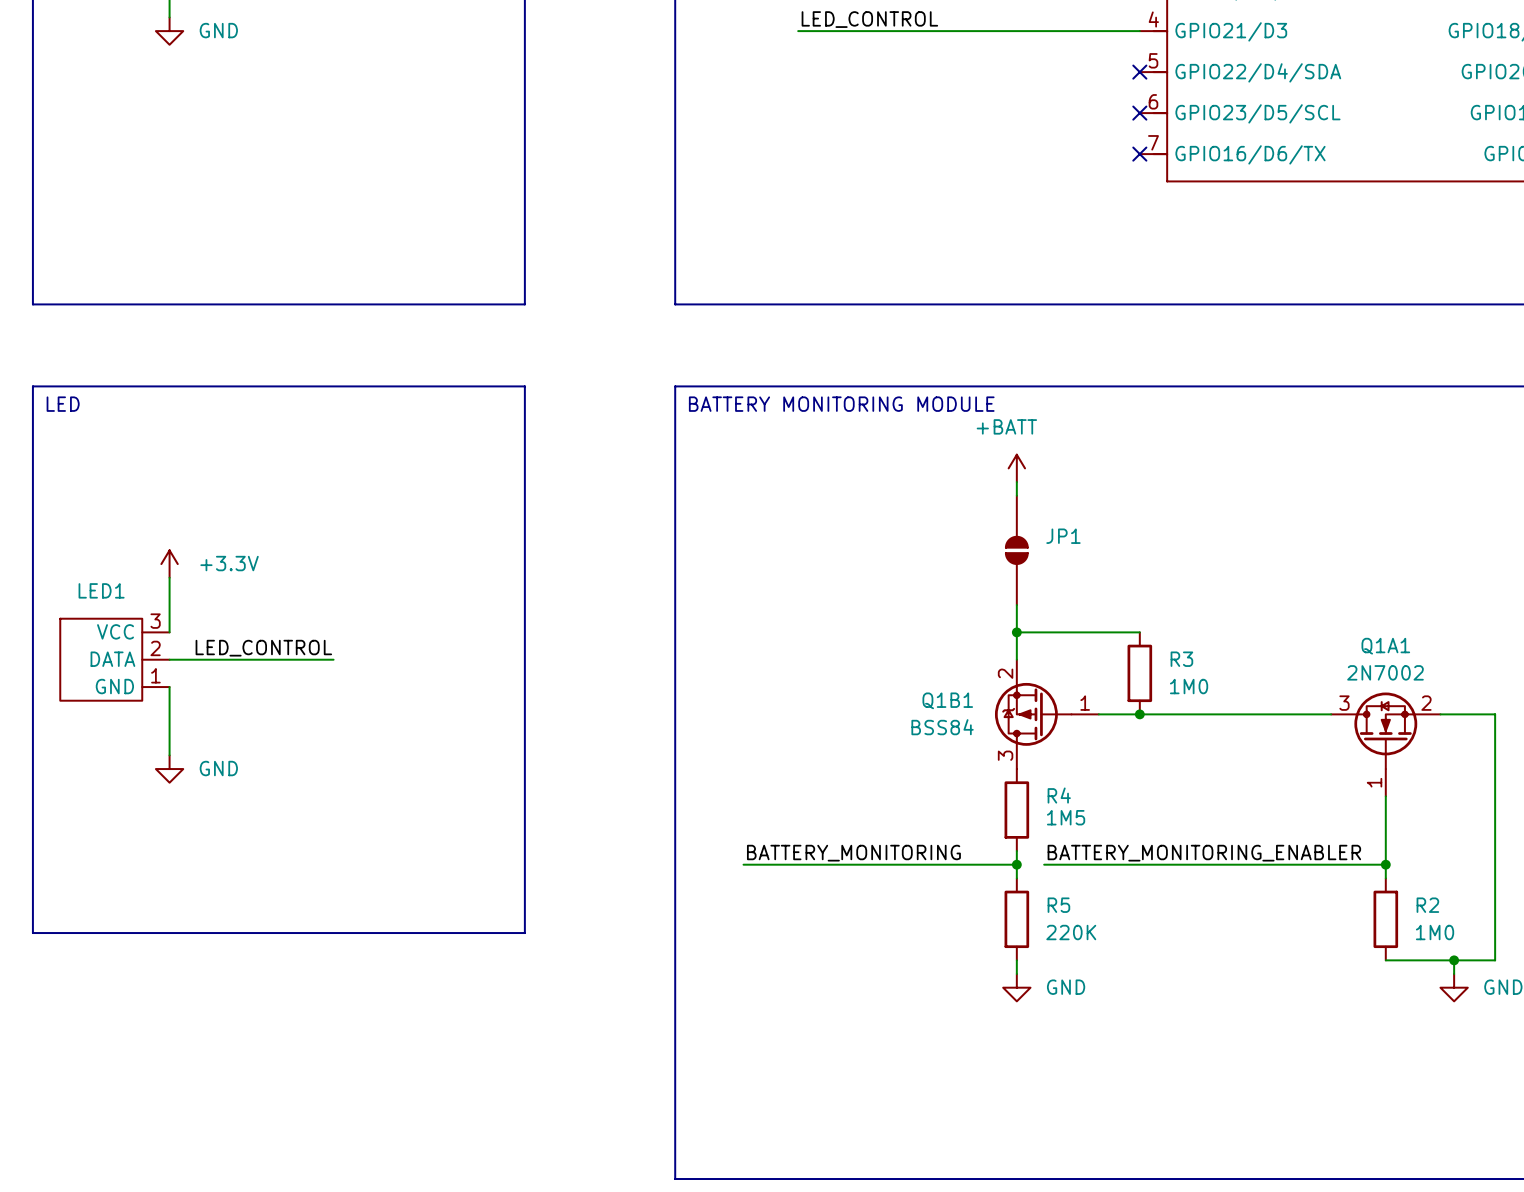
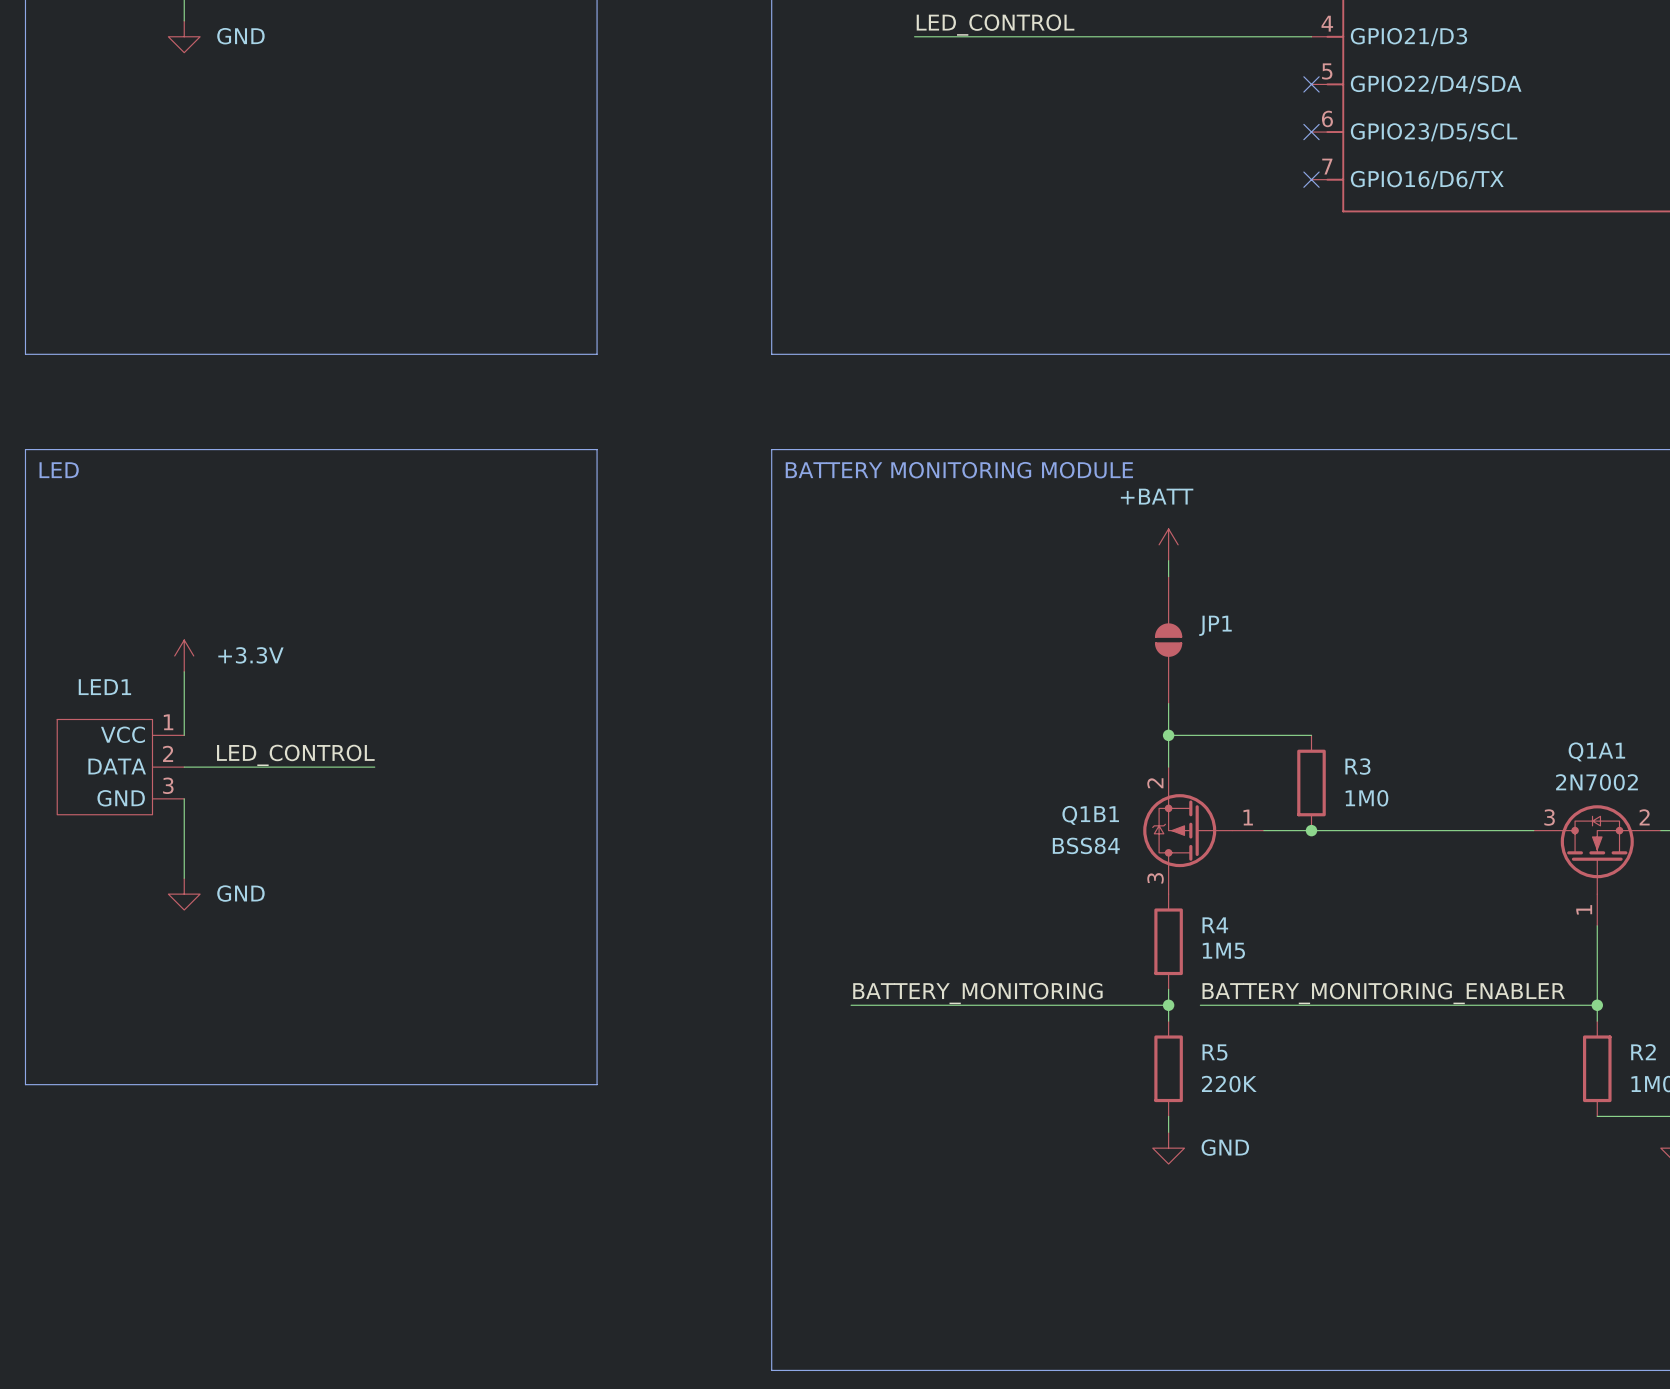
LED1 pin number: 3 (155, 621) -> 1 (168, 722)
LED1 pin number: 1 (155, 675) -> 3 (168, 785)

